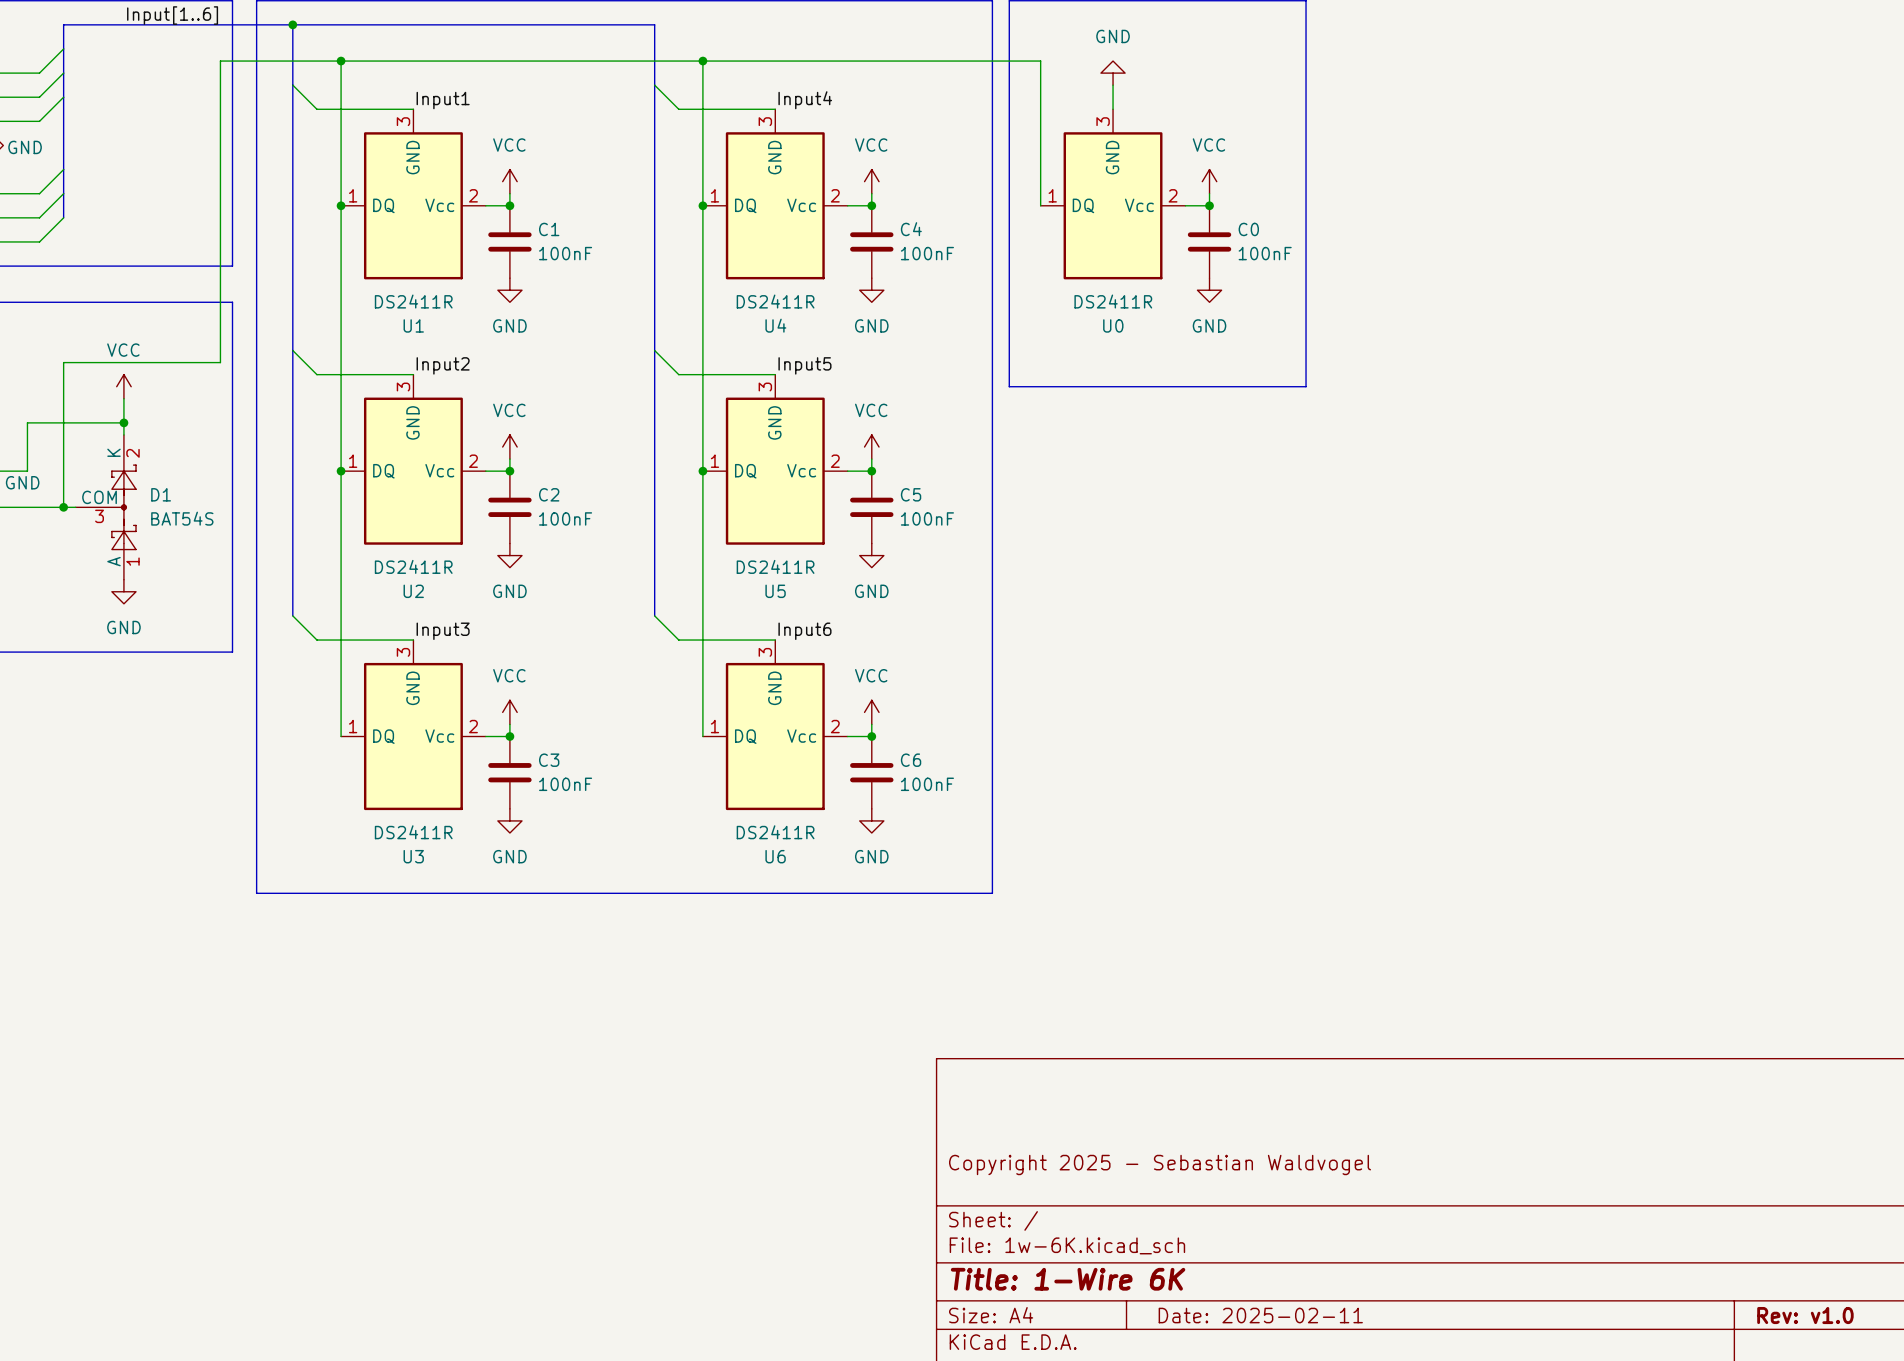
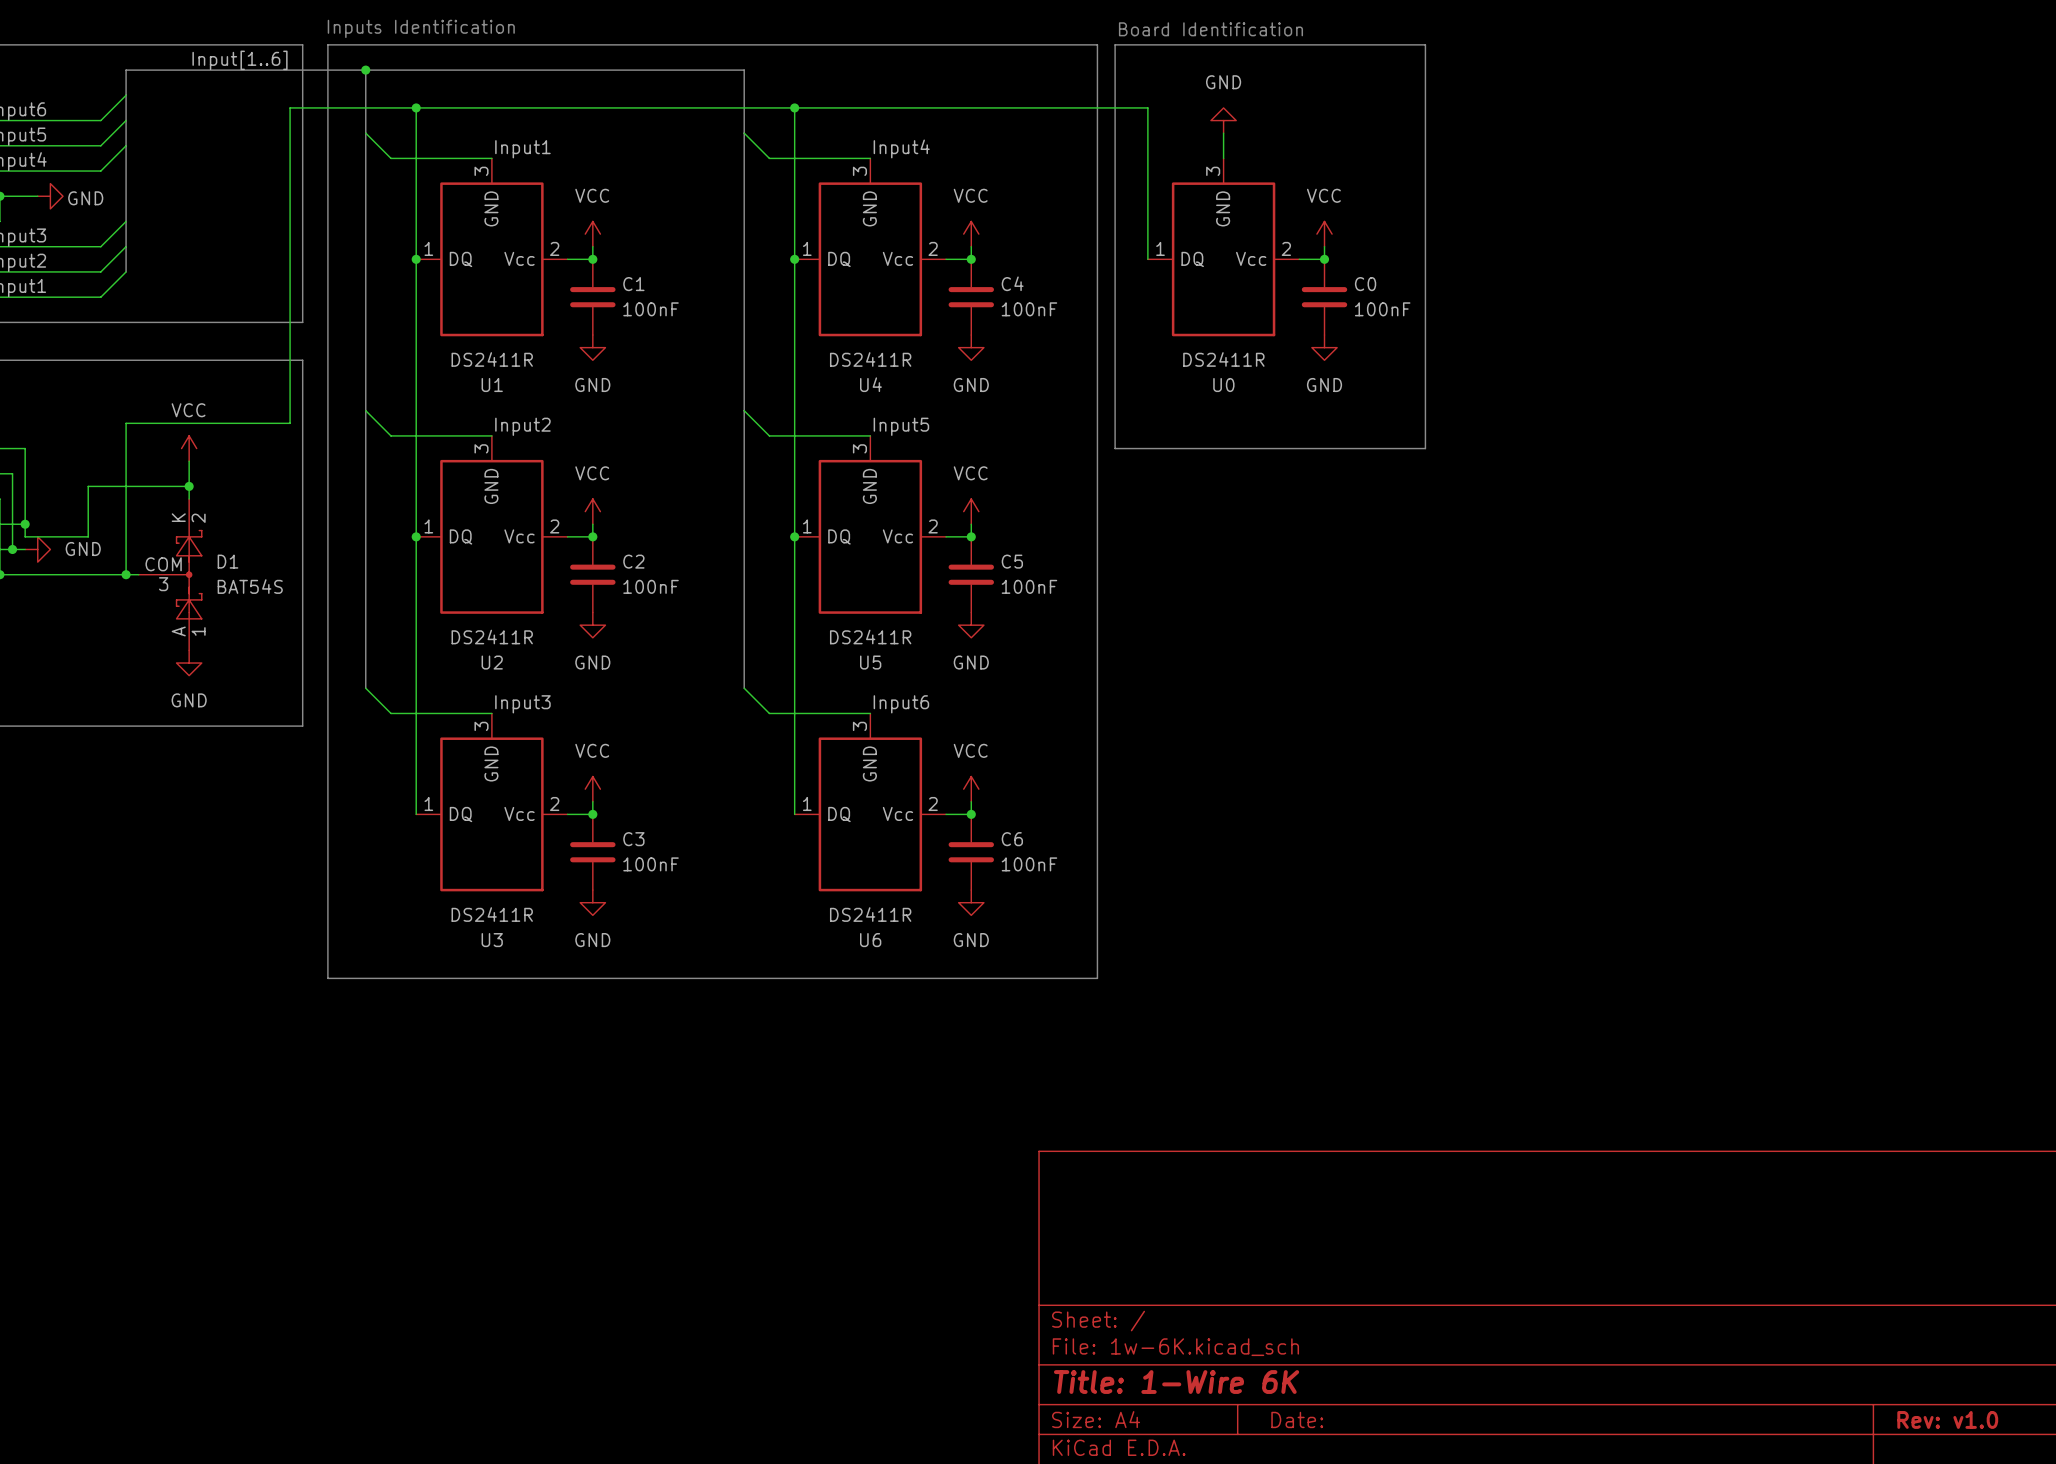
title block: Copyright 2025 - Sebastian Waldvogel (1160, 1164) -> none
title block: Date: 2025-02-11 (1260, 1315) -> Date: (1297, 1419)

